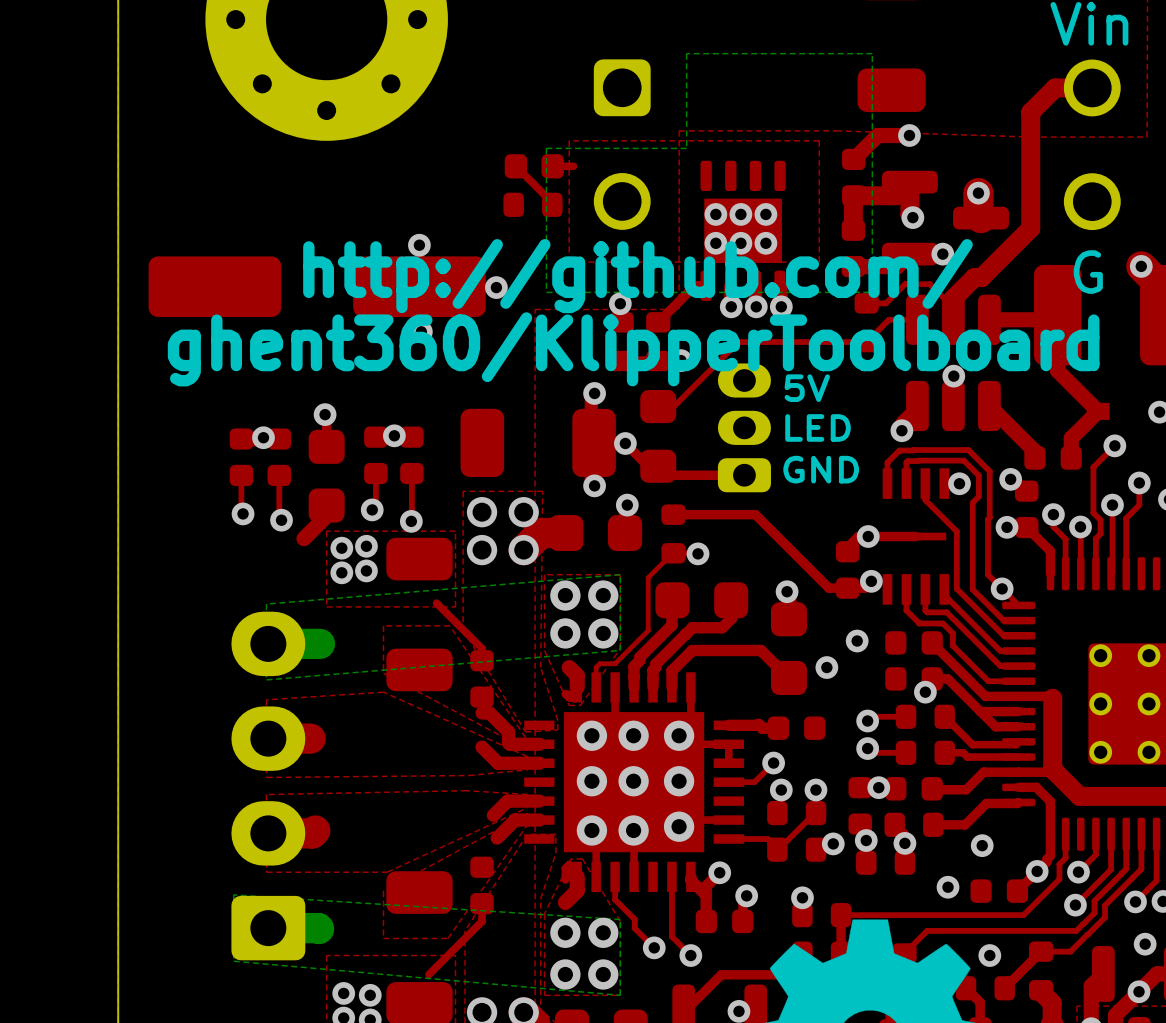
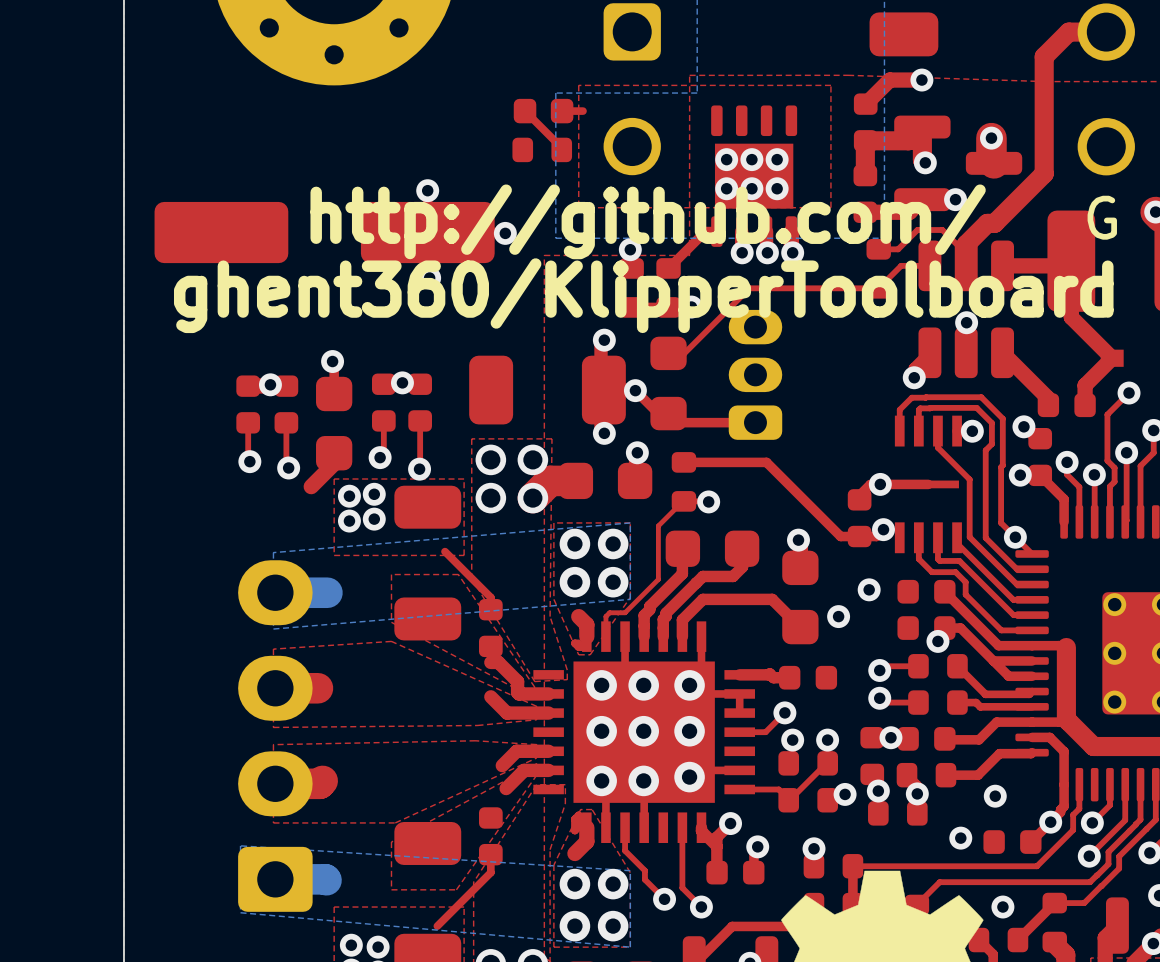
text: 5V (807, 388) -> none
text: LED (818, 427) -> none
text: GND (821, 469) -> none

